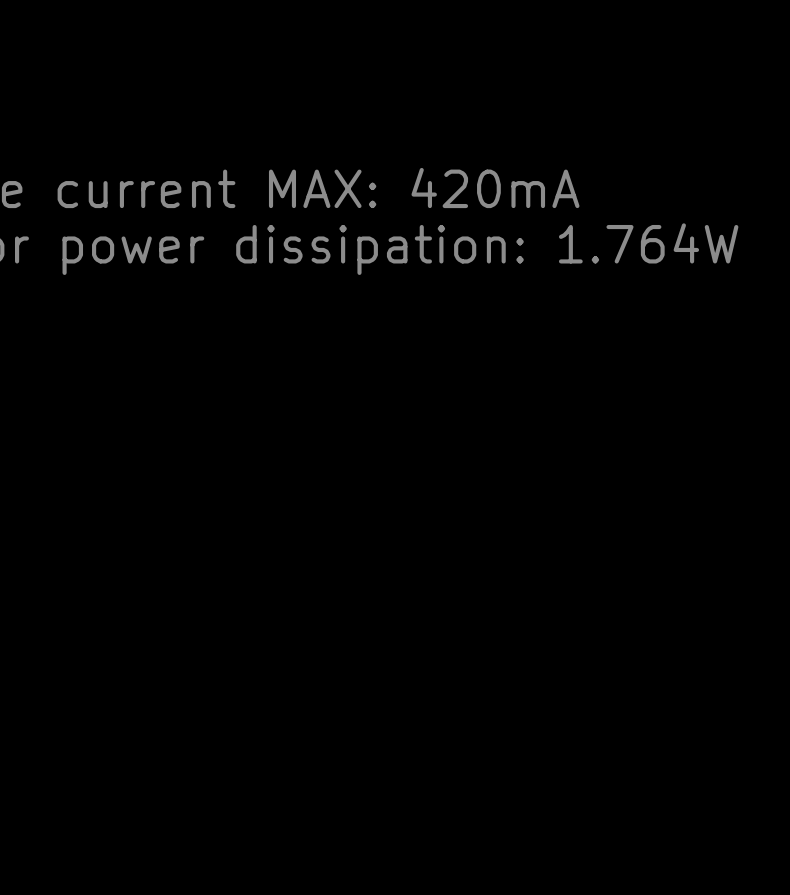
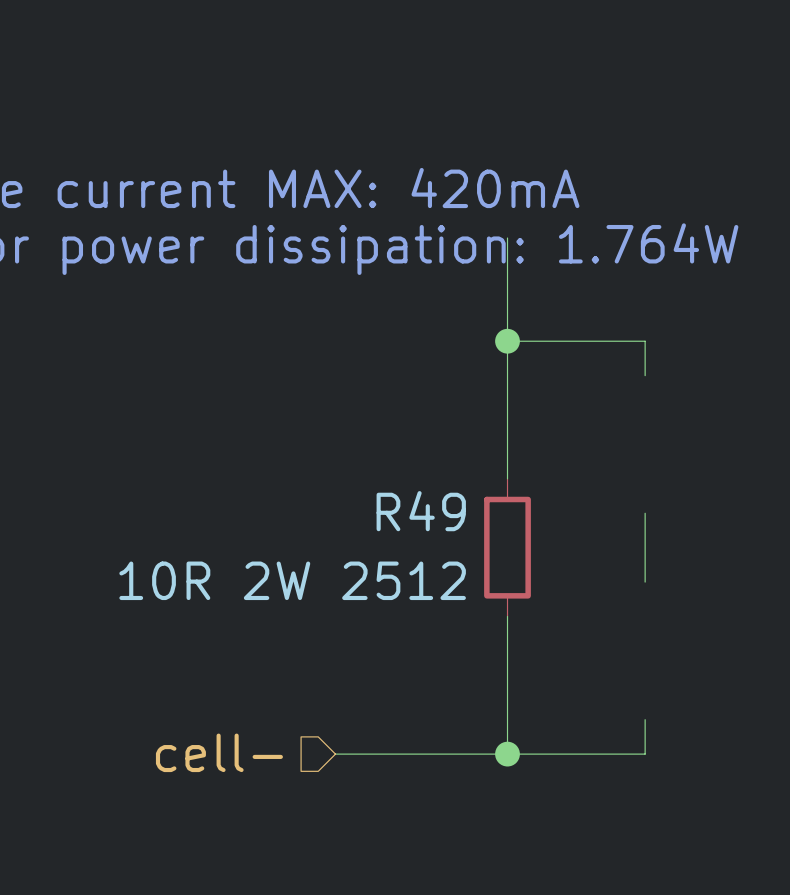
wire: none -> (507, 238) (507, 478)
wire: none -> (507, 341) (645, 341) (645, 375)
junction: none -> (507, 341)
wire: none -> (645, 513) (645, 582)
R49: none -> 10R 2W 2512 (507, 547)
wire: none -> (507, 616) (507, 754)
wire: none -> (645, 719) (645, 754) (335, 754)
hierarchical label: none -> cell- (219, 752)
junction: none -> (507, 754)

